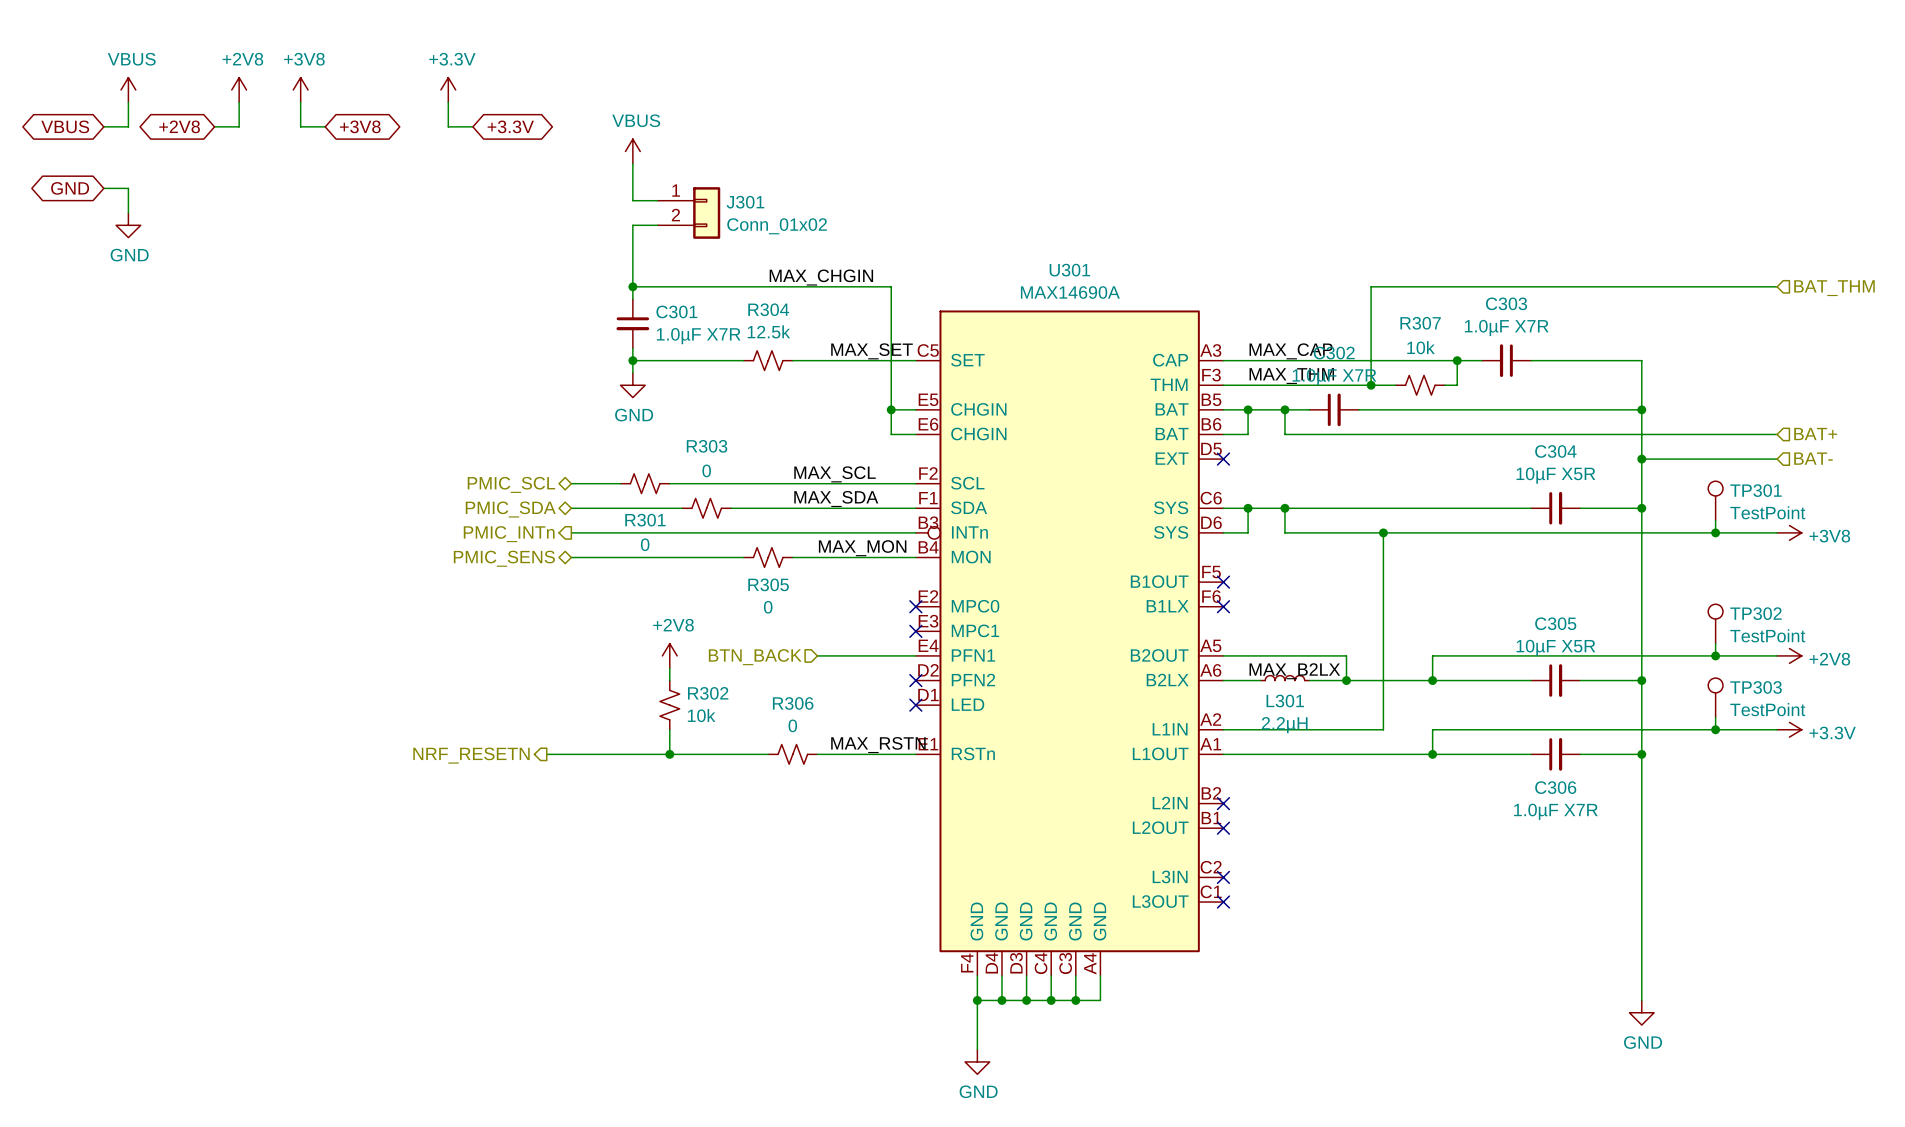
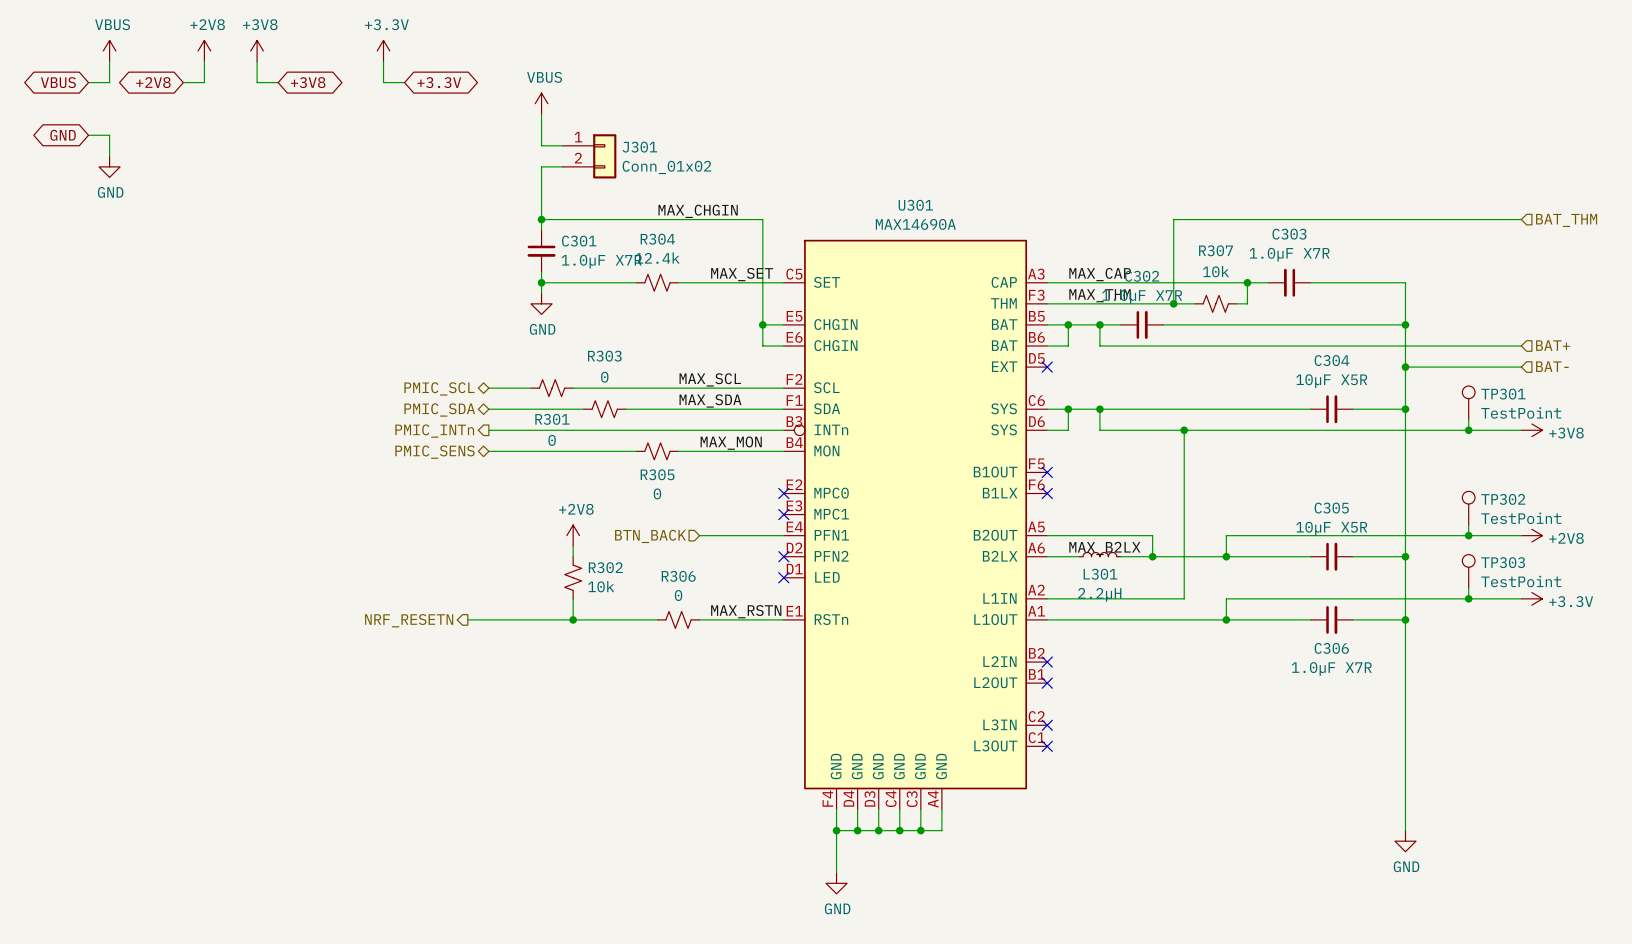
R304 value: 12.5k (768, 331) -> 12.4k (657, 258)

